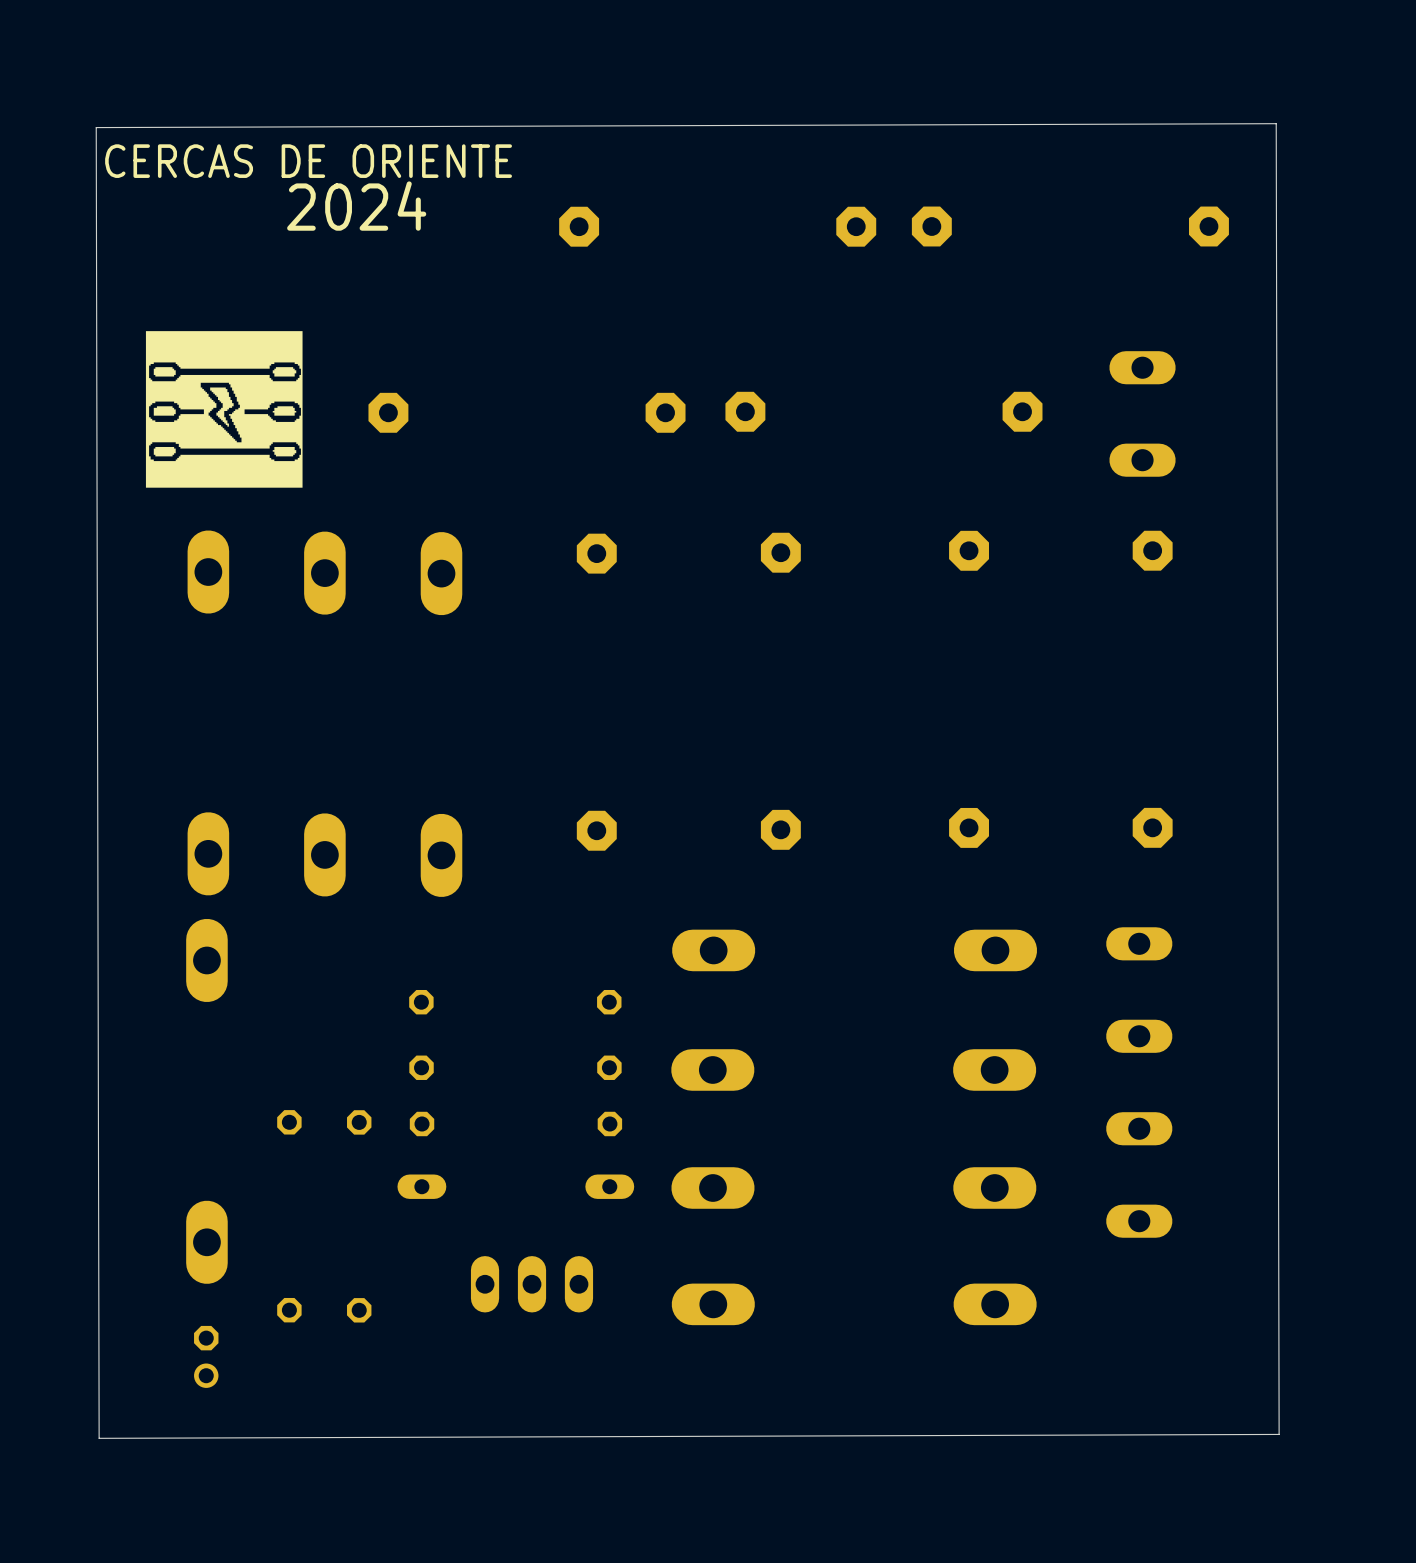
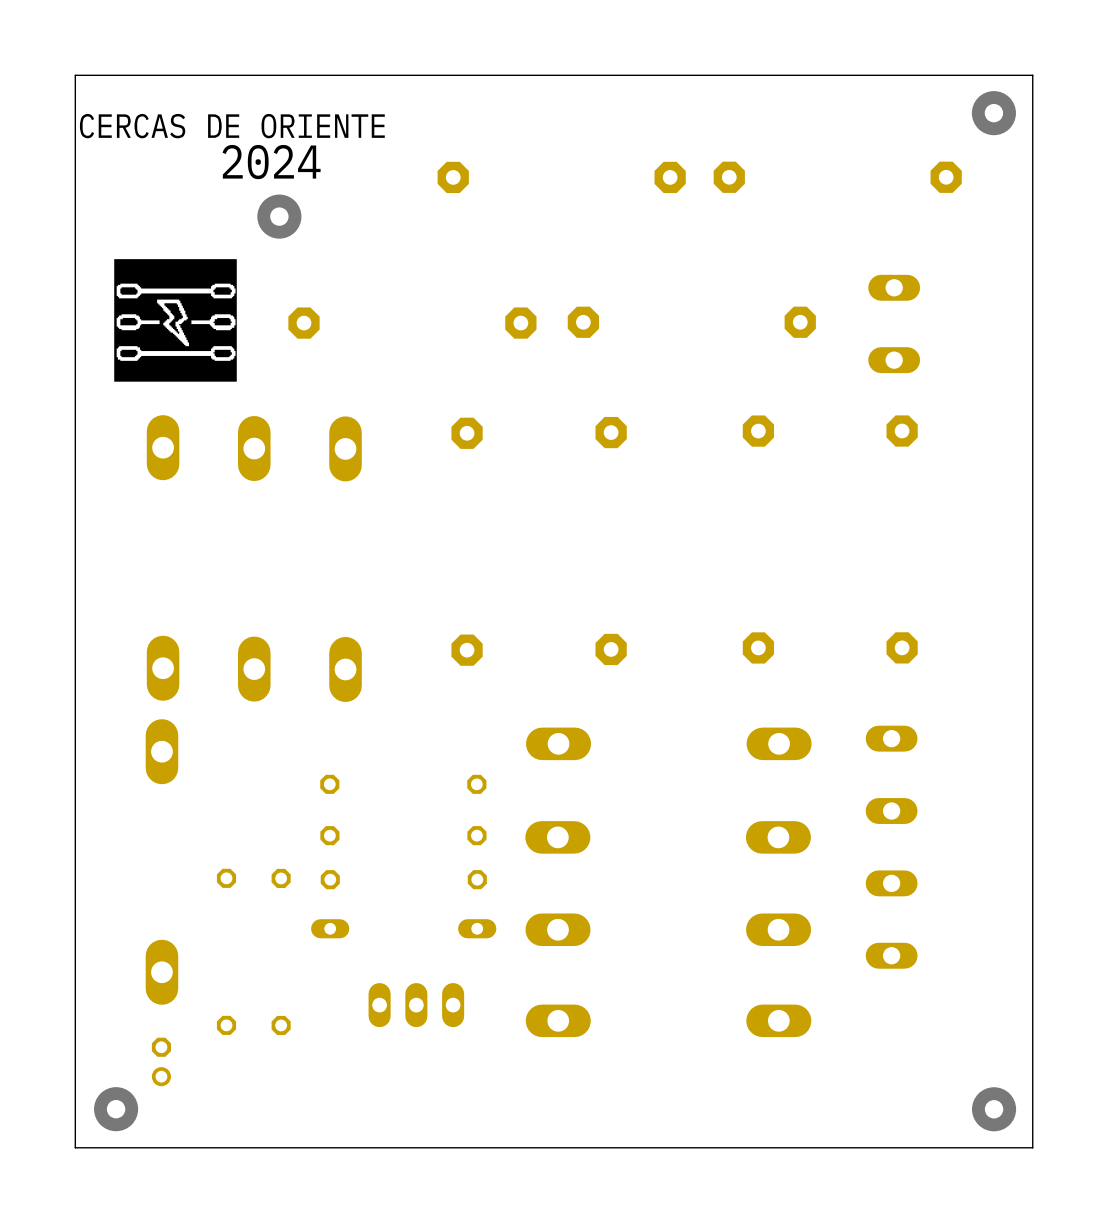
board edge: (1276, 123) (96, 127) (99, 1438) (1279, 1434) (1276, 123) -> (1032, 75) (1032, 1147) (75, 1147) (75, 75) (1032, 75)
via: none -> (993, 113)
via: none -> (279, 216)
via: none -> (116, 1109)
via: none -> (994, 1109)

